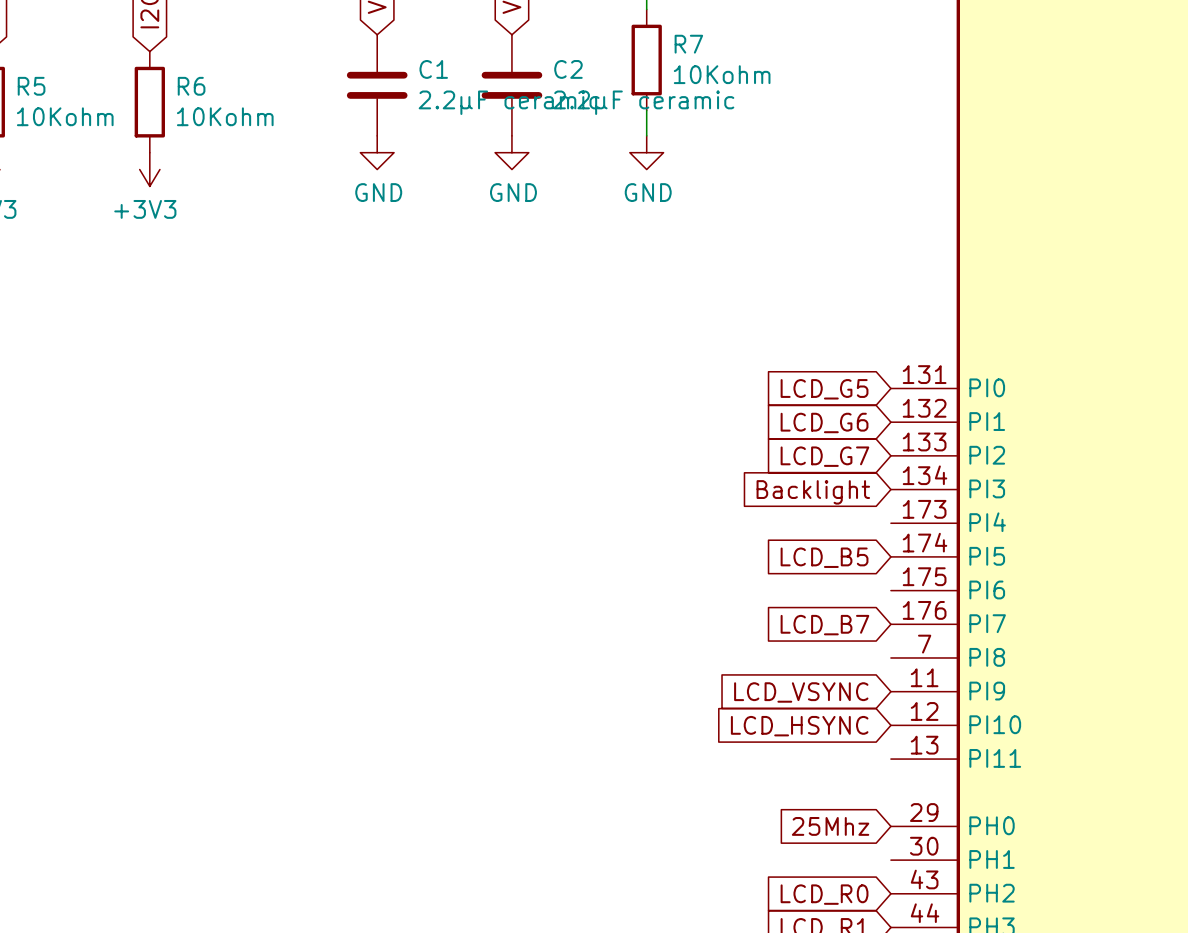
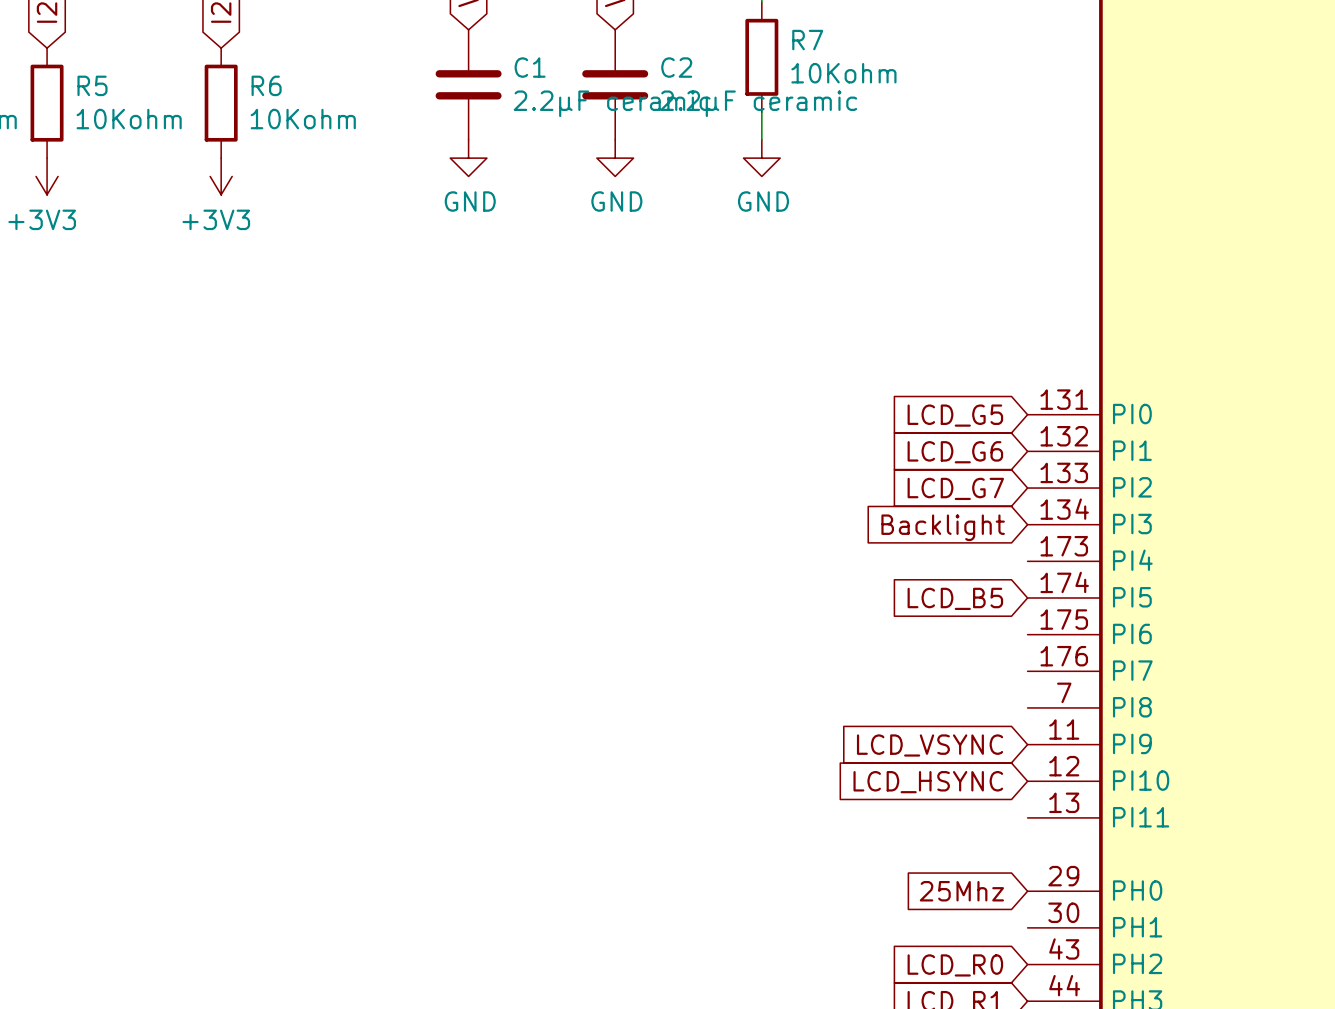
global label: LCD_B7 (824, 625) -> none

